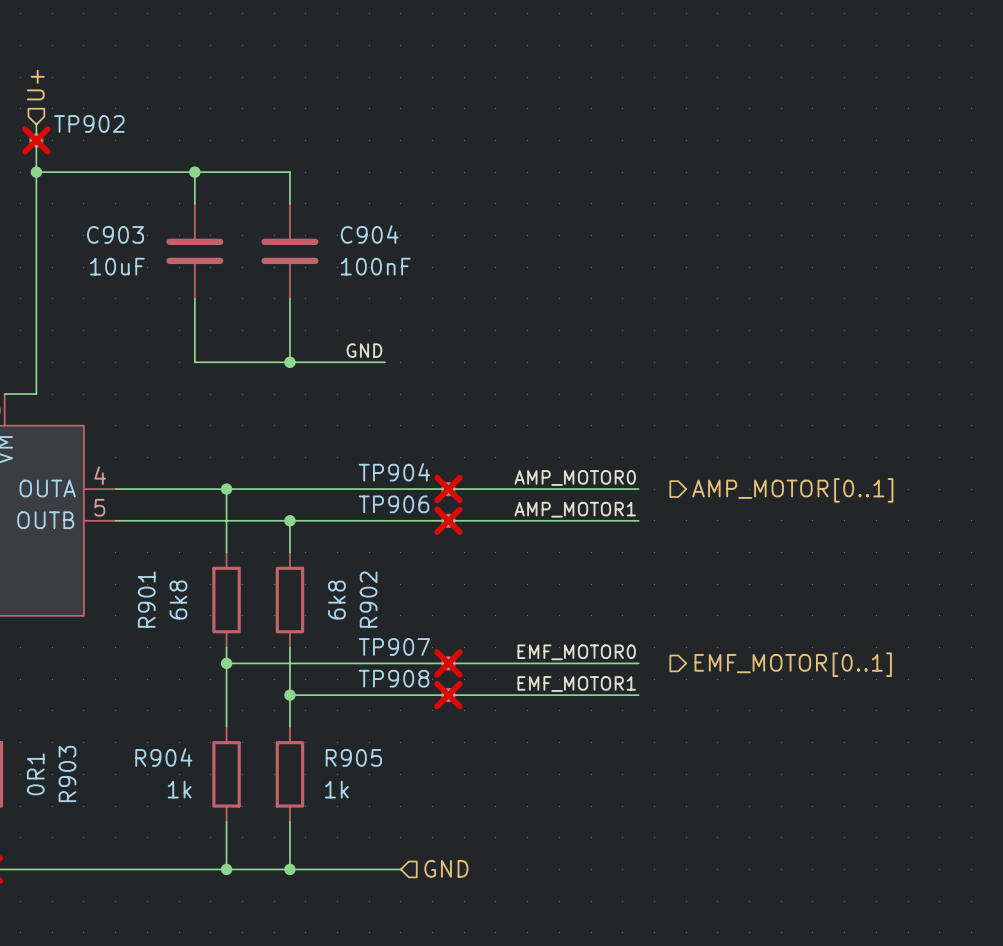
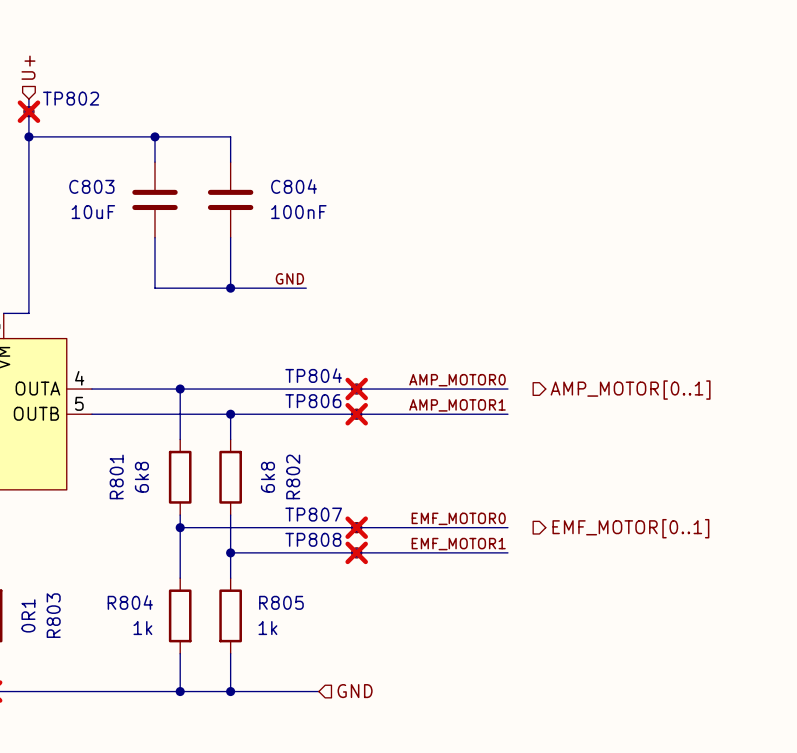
TP902 name: TP902 (89, 123) -> TP802 (71, 98)
C903 name: C903 (115, 234) -> C803 (91, 186)
C904 name: C904 (369, 234) -> C804 (294, 186)
TP904 name: TP904 (394, 472) -> TP804 (313, 375)
TP906 name: TP906 (393, 504) -> TP806 (313, 401)
R901 name: R901 (146, 599) -> R801 (116, 476)
R902 name: R902 (368, 599) -> R802 (293, 476)
TP907 name: TP907 (394, 646) -> TP807 (313, 514)
TP908 name: TP908 (393, 678) -> TP808 (313, 539)
R904 name: R904 (163, 757) -> R804 (130, 602)
R905 name: R905 (353, 757) -> R805 (281, 602)
R903 name: R903 (67, 773) -> R803 (53, 615)

